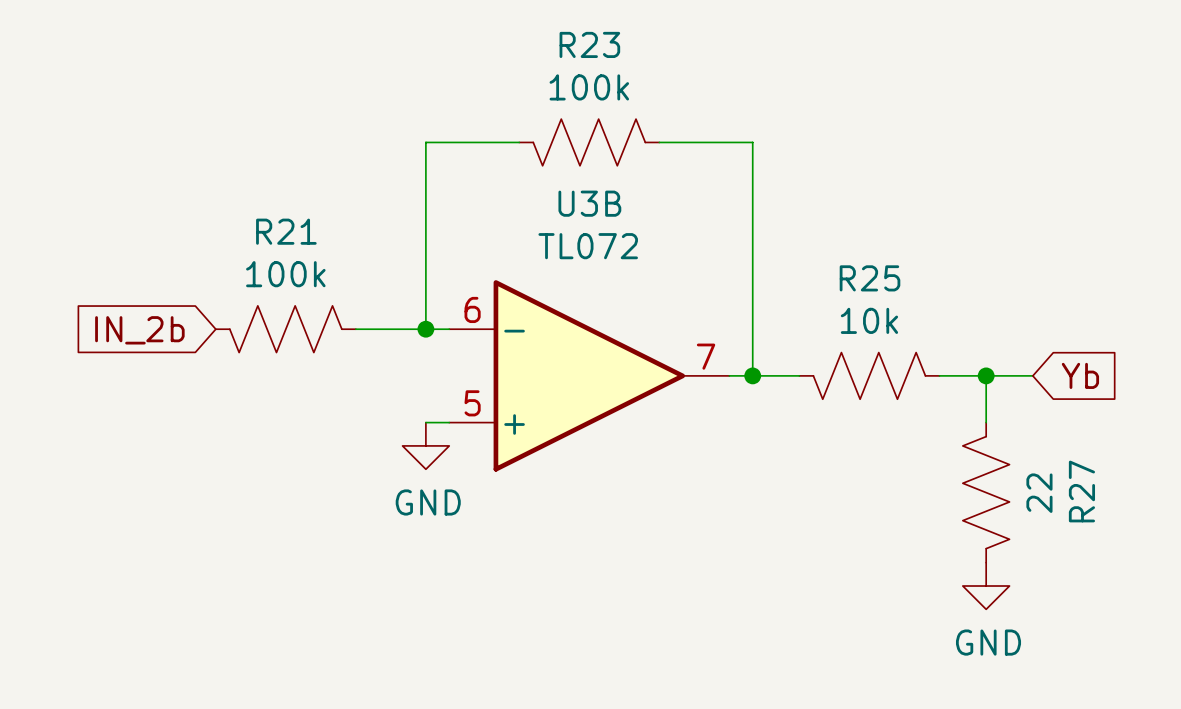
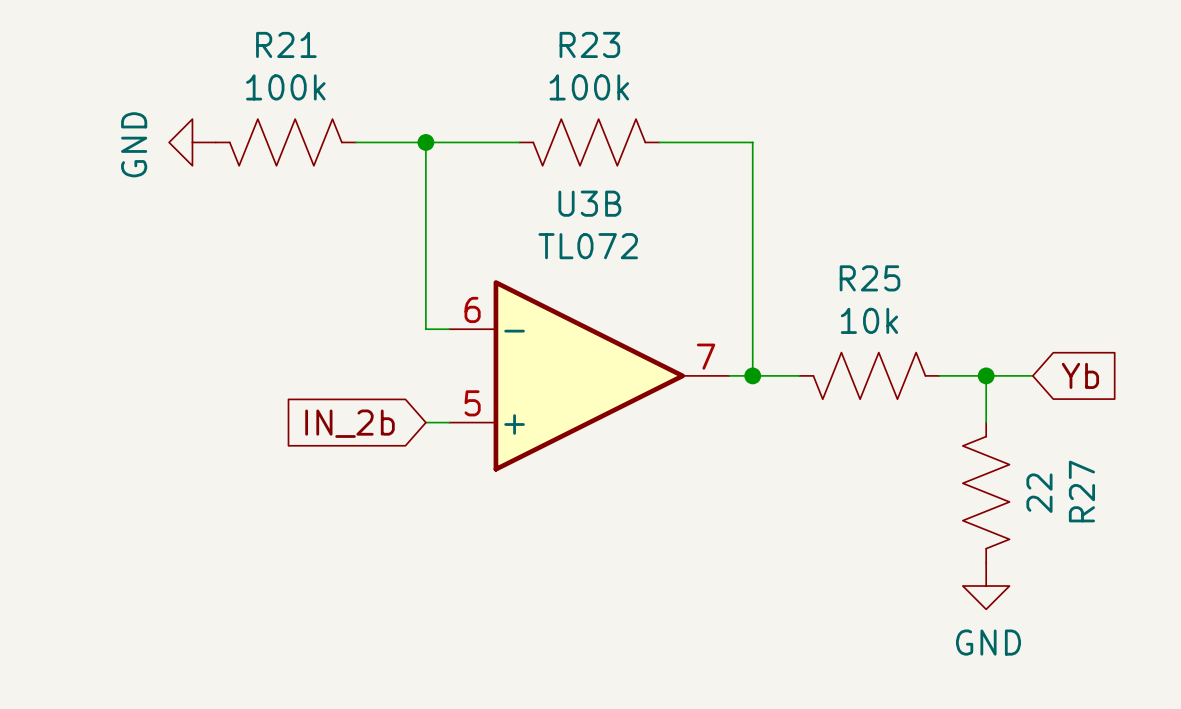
junction: none -> (425, 142)
R21 position: (285, 329) -> (285, 142)
wire: (355, 329) (425, 329) -> (355, 142) (425, 142)
junction: (425, 329) -> none
global label position: IN_2b (139, 330) -> IN_2b (349, 423)
power symbol rotation: 0° (425, 445) -> 90° clockwise (192, 142)
power symbol position: GND (425, 445) -> GND (192, 142)

